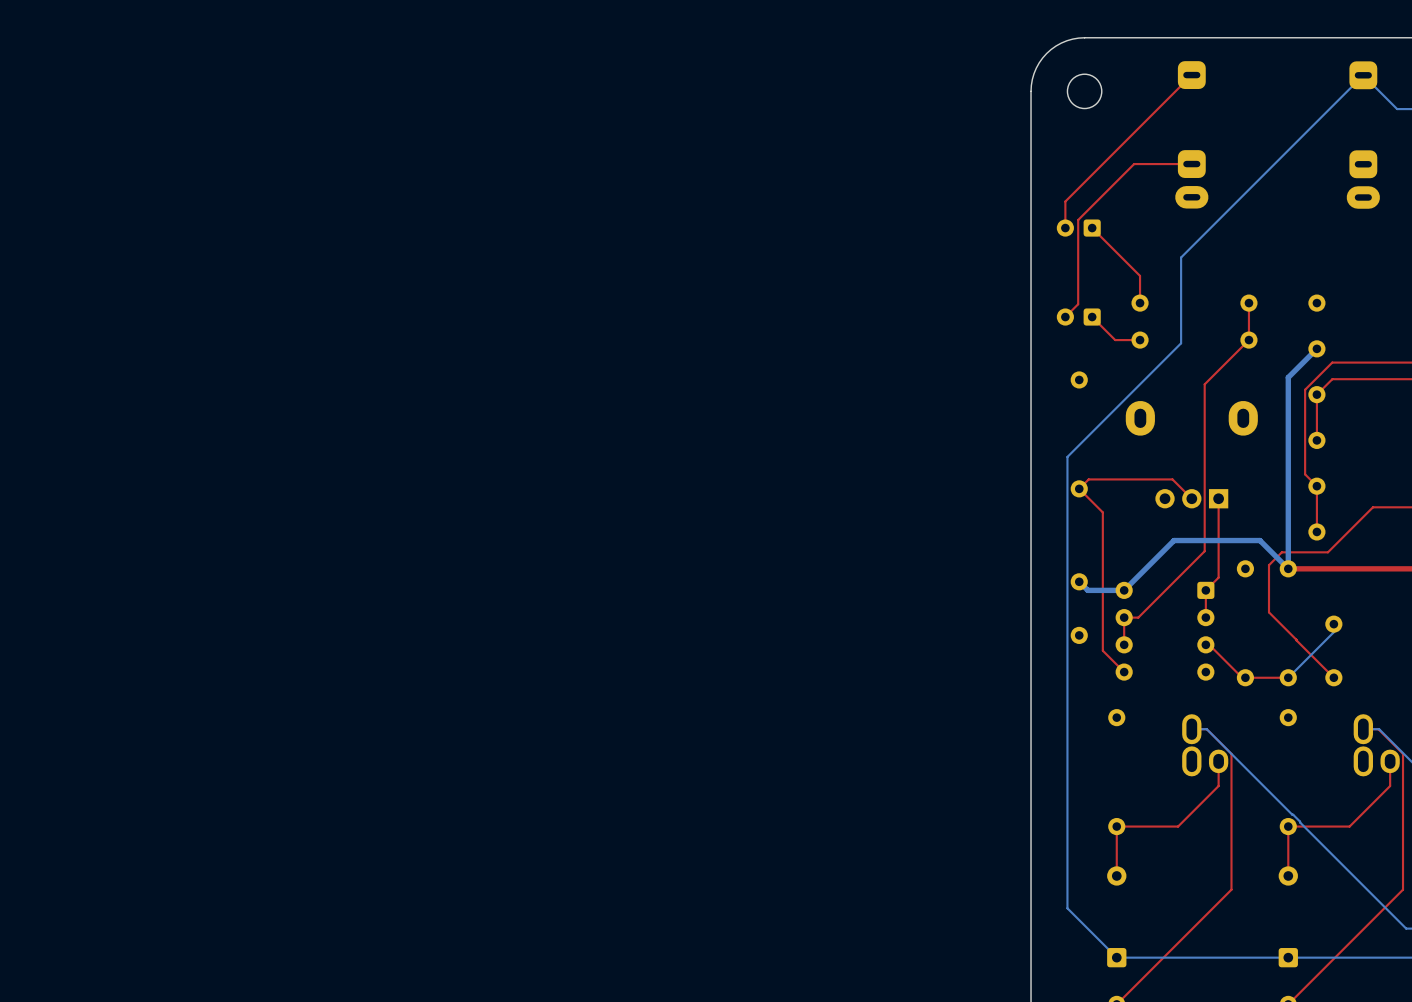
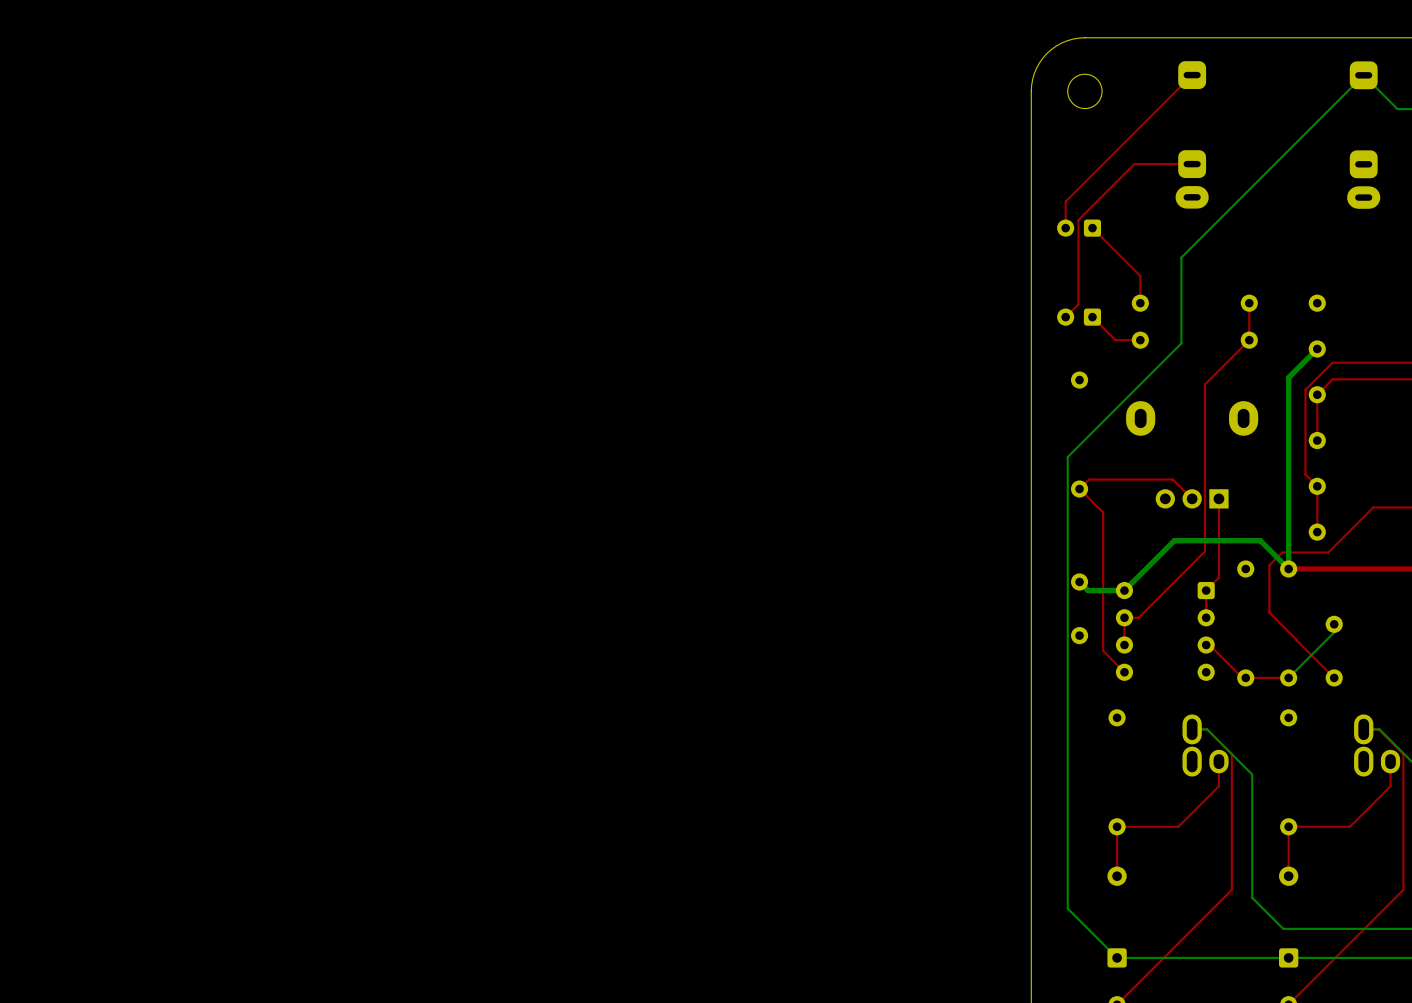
bottom track: (1251, 774) (1406, 928) -> (1252, 774) (1252, 897) (1283, 928) (1406, 928)

